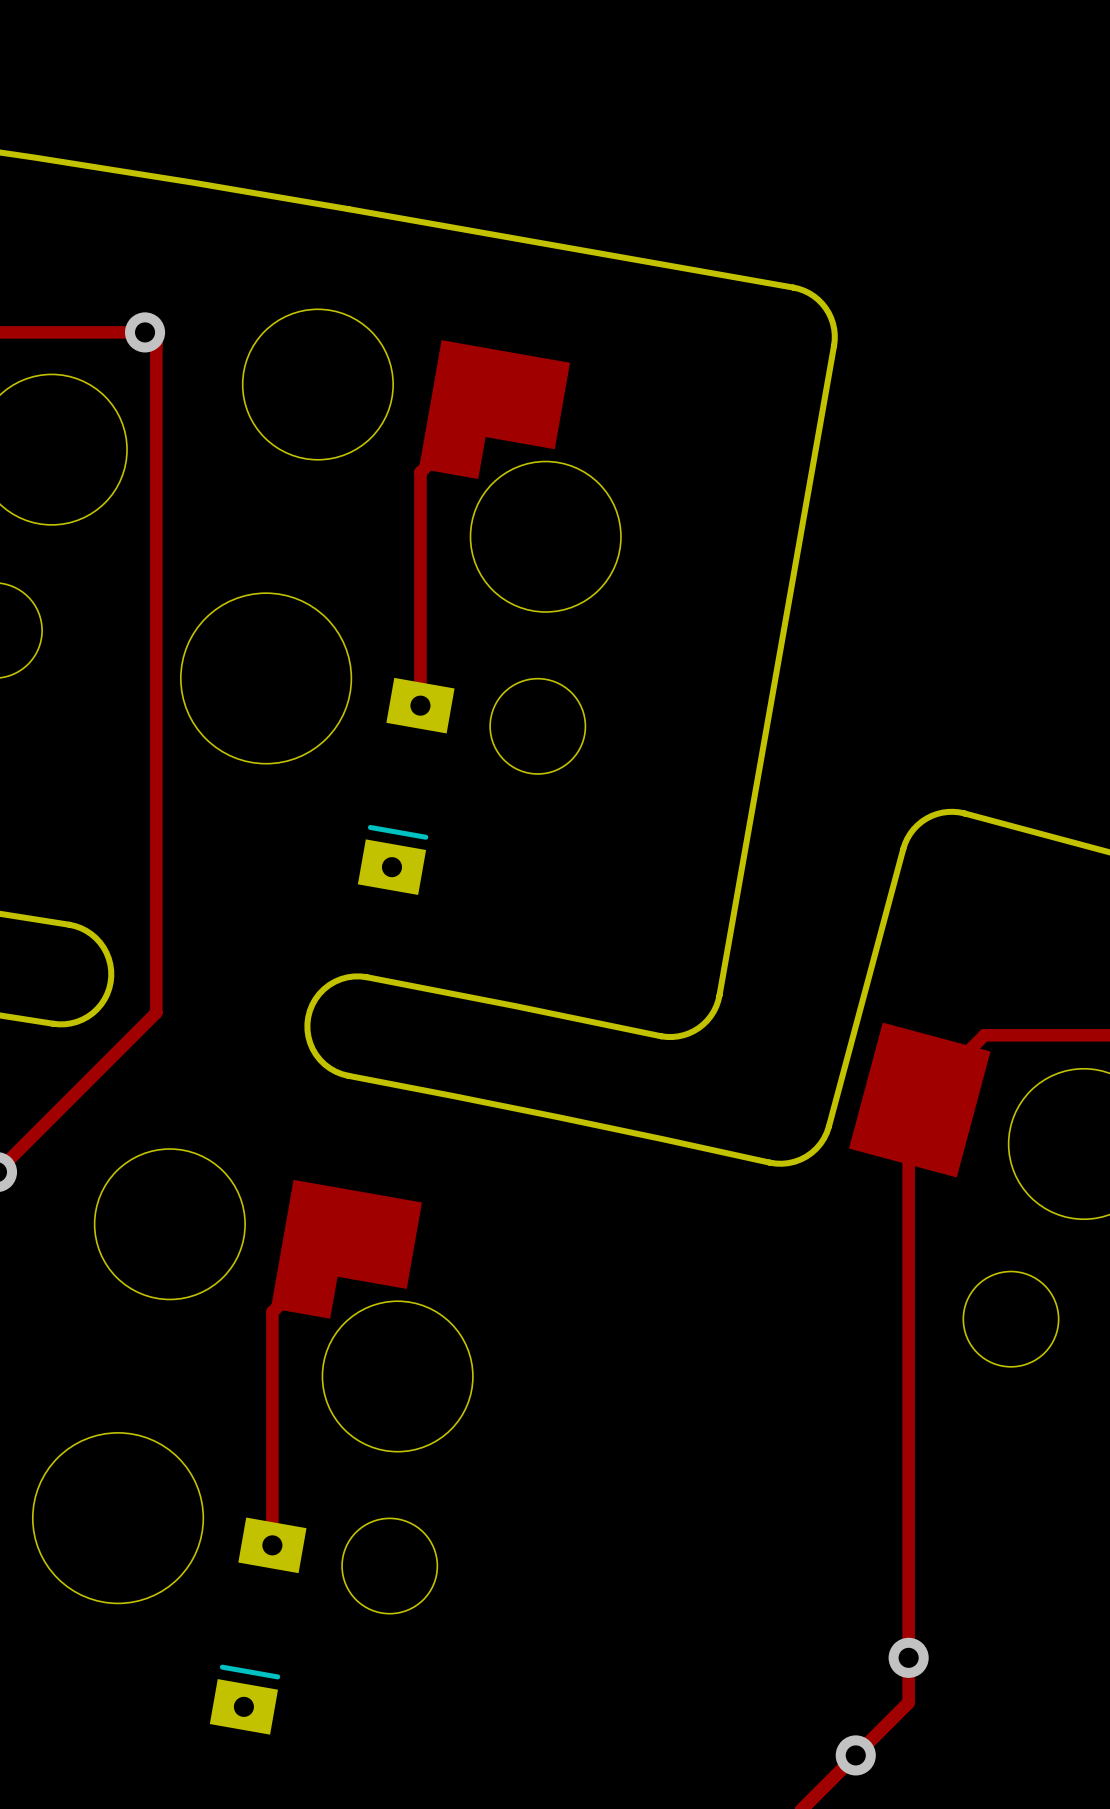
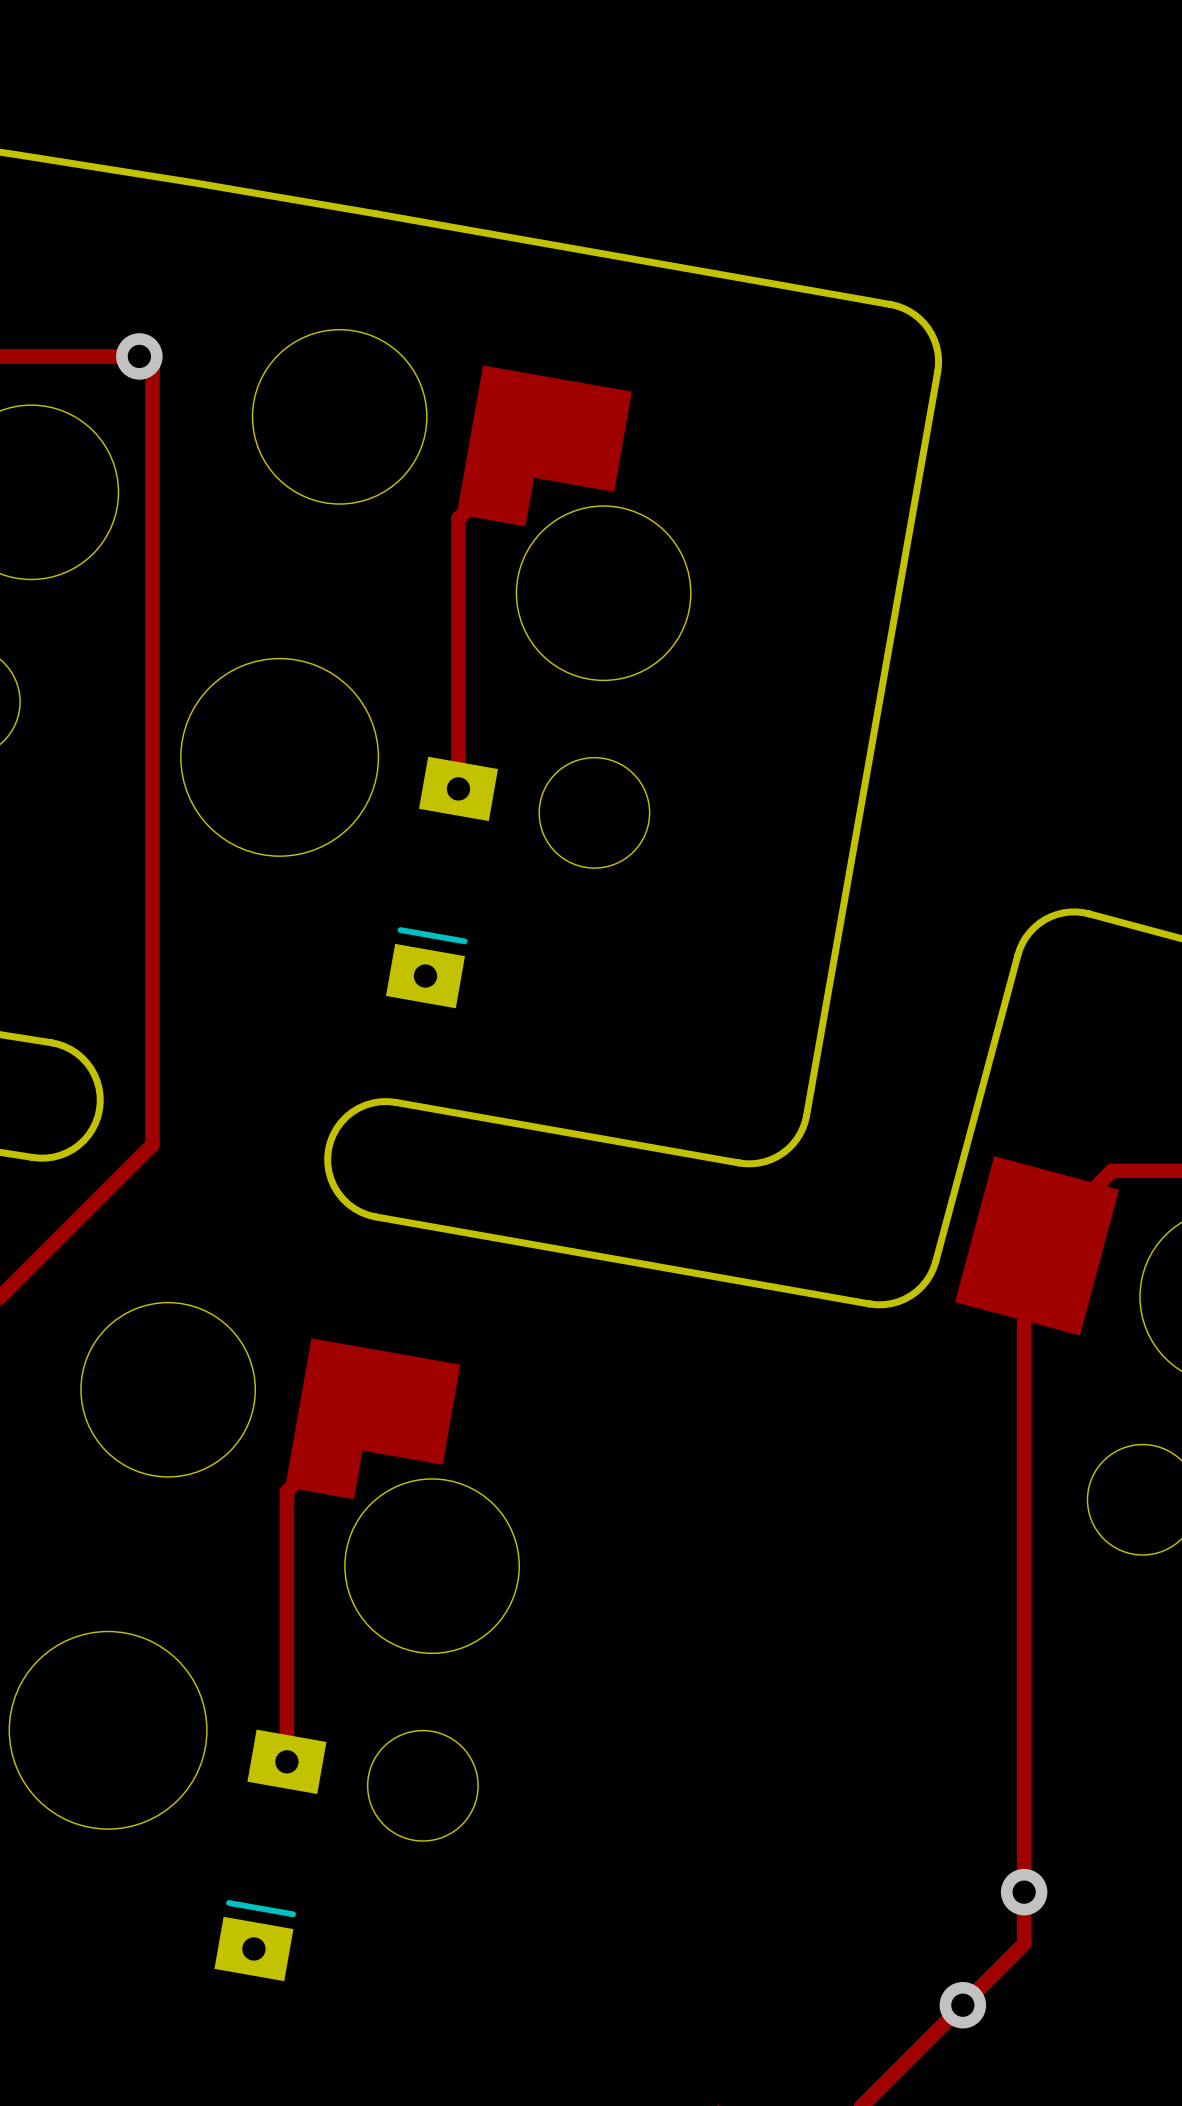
board edge: (720, 987) (716, 1006) (703, 1024) (683, 1035) (666, 1036) (366, 977) (353, 976) (334, 981) (319, 993) (309, 1010) (307, 1030) (310, 1043) (316, 1054) (324, 1064) (341, 1074) (559, 1117) (769, 1162) (782, 1163) (794, 1161) (811, 1152) (824, 1138) (832, 1113) -> (806, 1115) (796, 1139) (782, 1153) (765, 1161) (745, 1163) (395, 1102) (380, 1101) (358, 1108) (341, 1122) (330, 1142) (327, 1164) (331, 1179) (342, 1198) (354, 1208) (368, 1215) (869, 1303) (890, 1303) (910, 1295) (926, 1281) (935, 1261)

